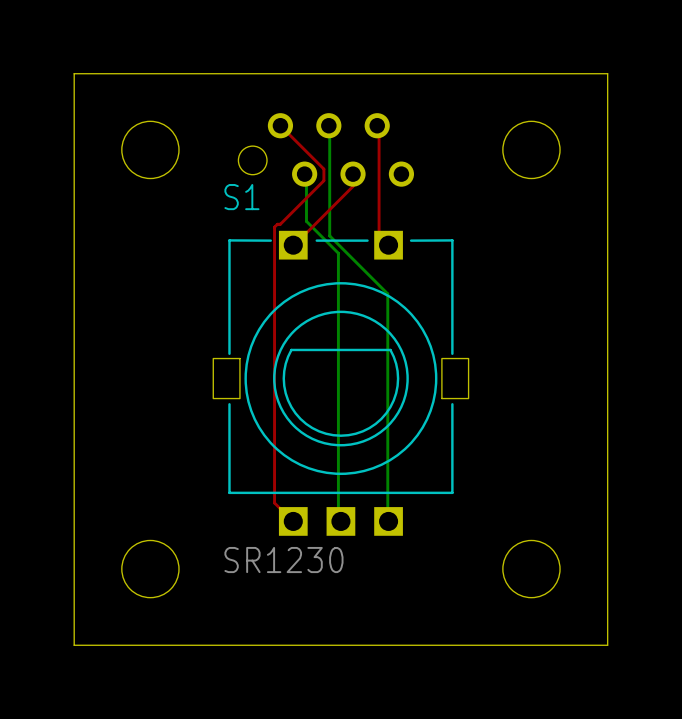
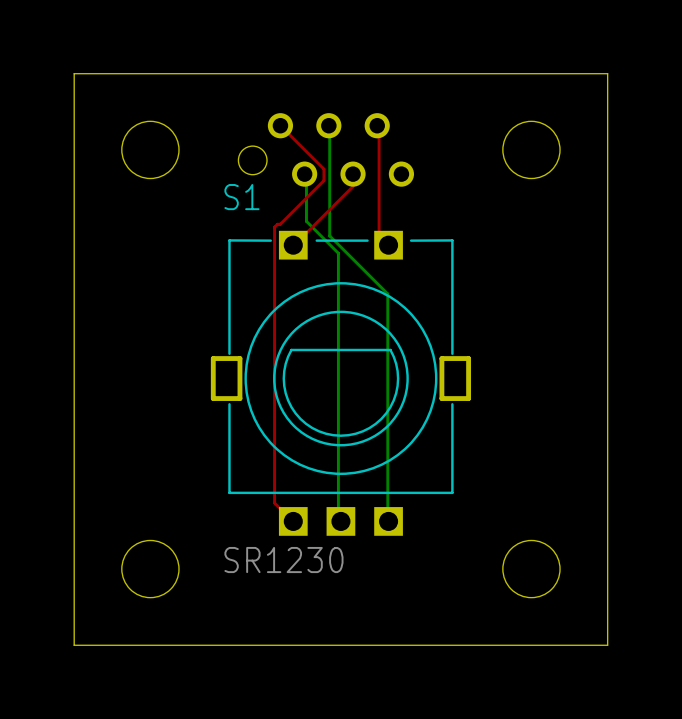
board edge: none -> (213, 358) (239, 358) (239, 398) (213, 398) (213, 358)
board edge: none -> (441, 358) (468, 358) (468, 398) (441, 398) (441, 358)

